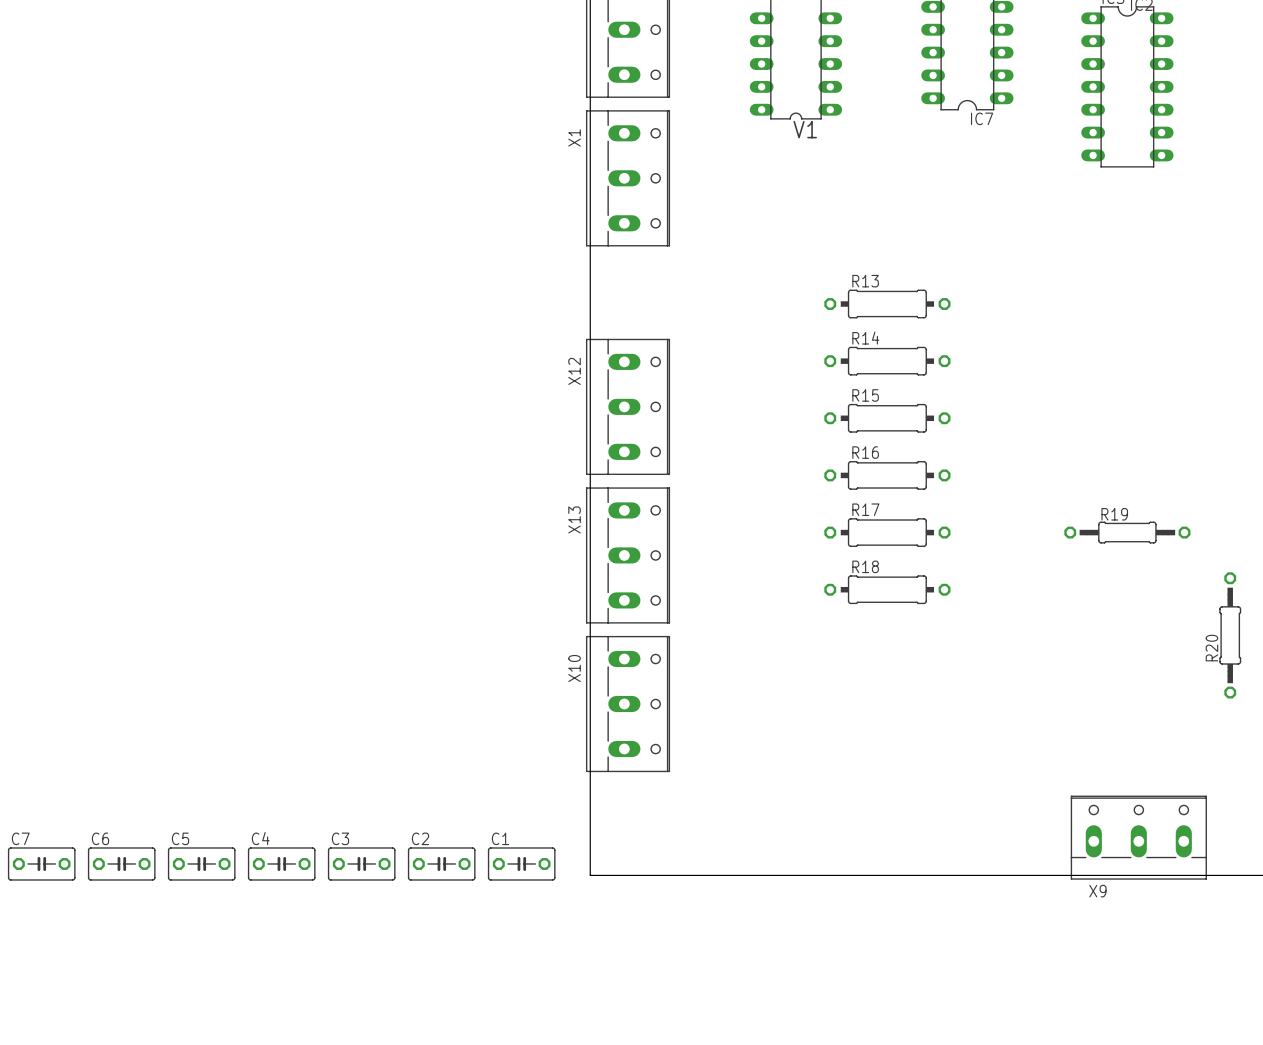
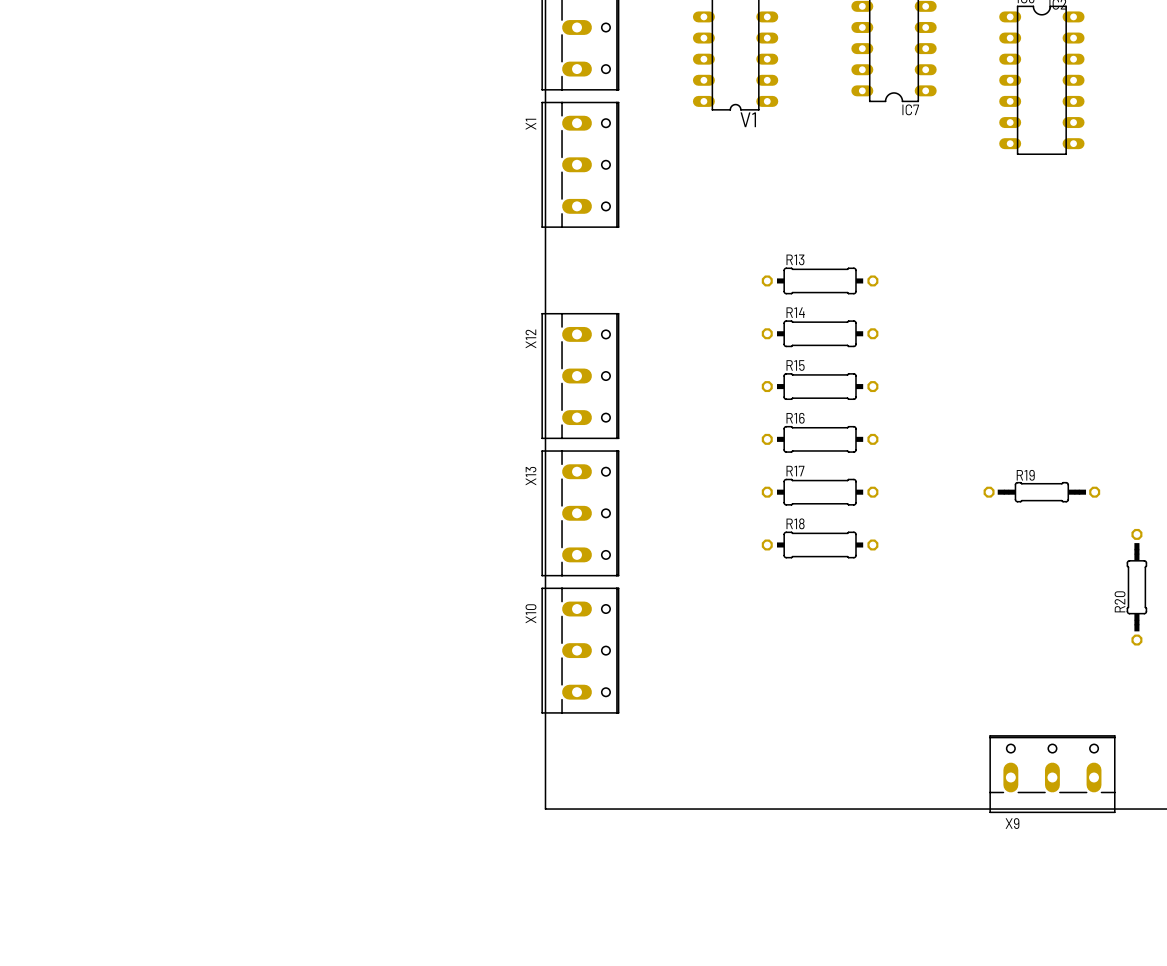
C7: (41, 863) -> none
C6: (121, 863) -> none
C5: (201, 863) -> none
C4: (281, 863) -> none
C3: (361, 863) -> none
C2: (441, 863) -> none
C1: (521, 863) -> none

